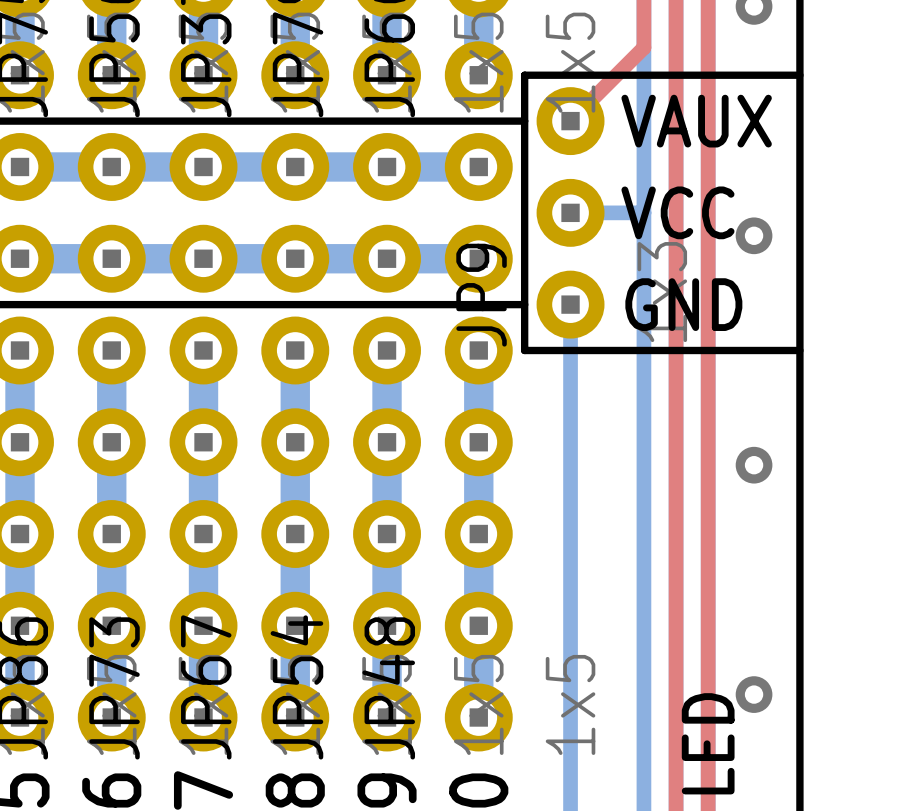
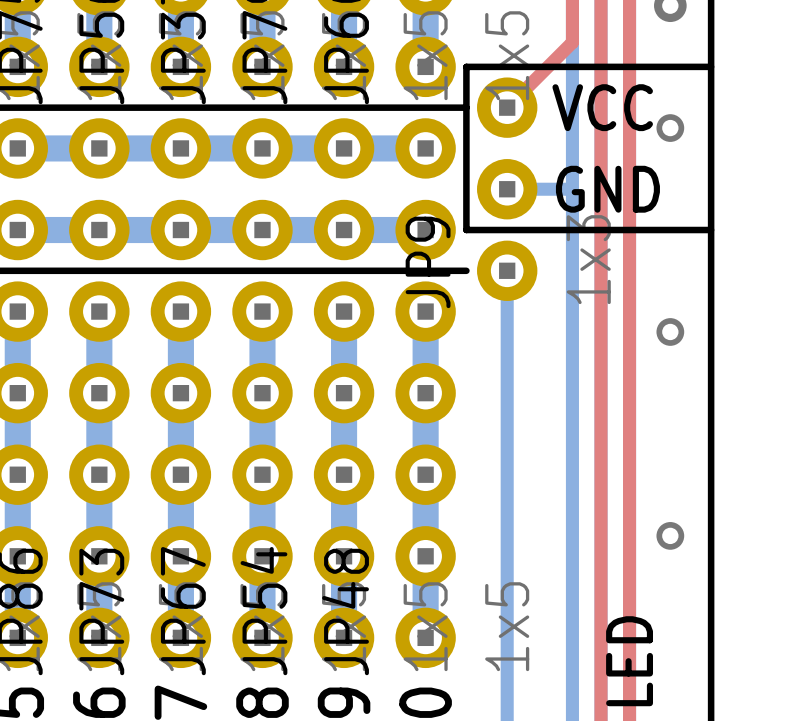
text: VAUX (696, 121) -> VCC (602, 107)
via: none -> (670, 128)
text: VCC (677, 212) -> GND (607, 189)
via: (754, 235) -> none
line: (524, 258) (524, 350) (799, 350) -> (466, 230) (711, 230)
text: GND (683, 304) -> none
via: none -> (670, 331)
via: (754, 465) -> none
via: none -> (670, 535)
via: (754, 694) -> none

